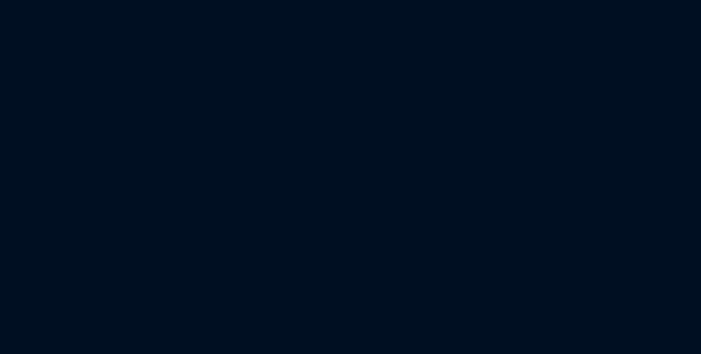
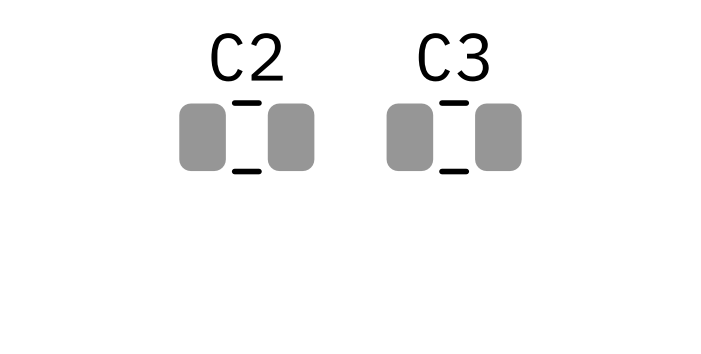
C2: none -> (246, 137)
C3: none -> (454, 137)

